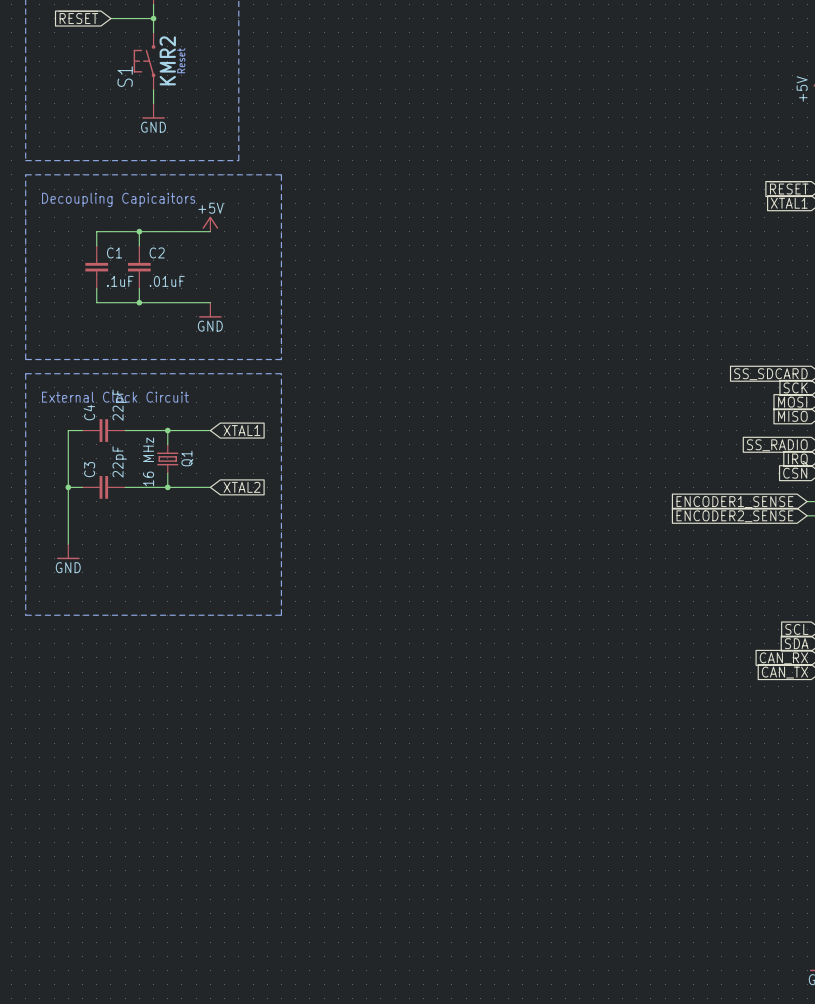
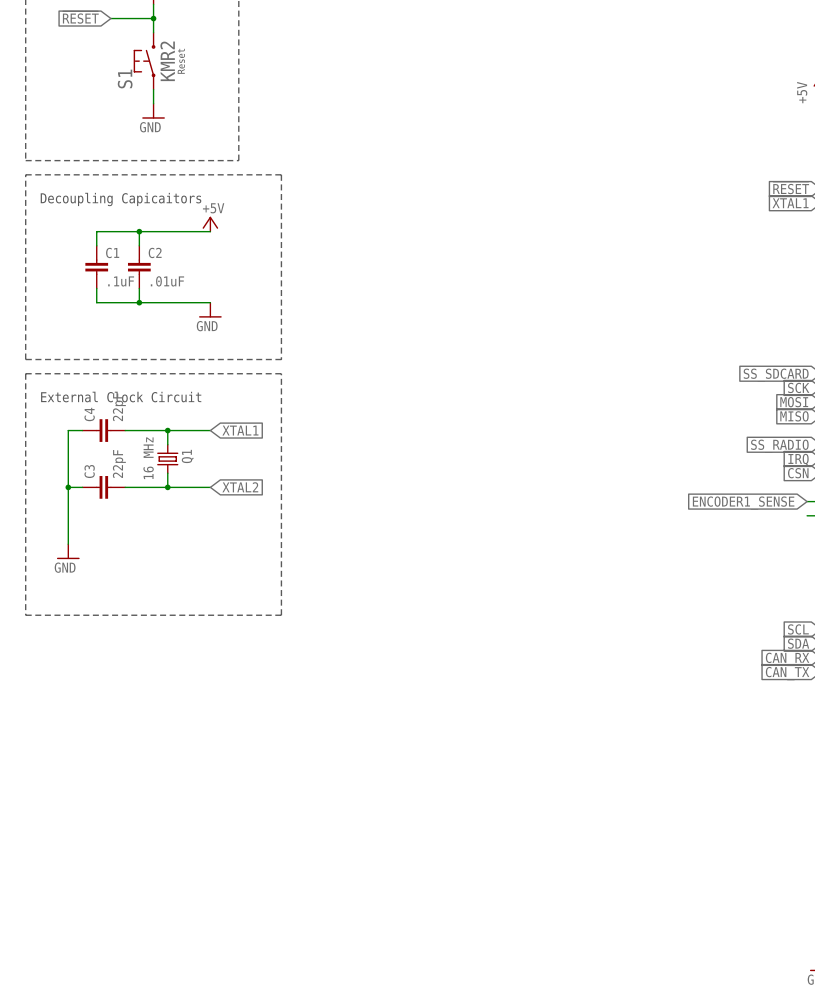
global label: ENCODER2_SENSE (734, 516) -> none

